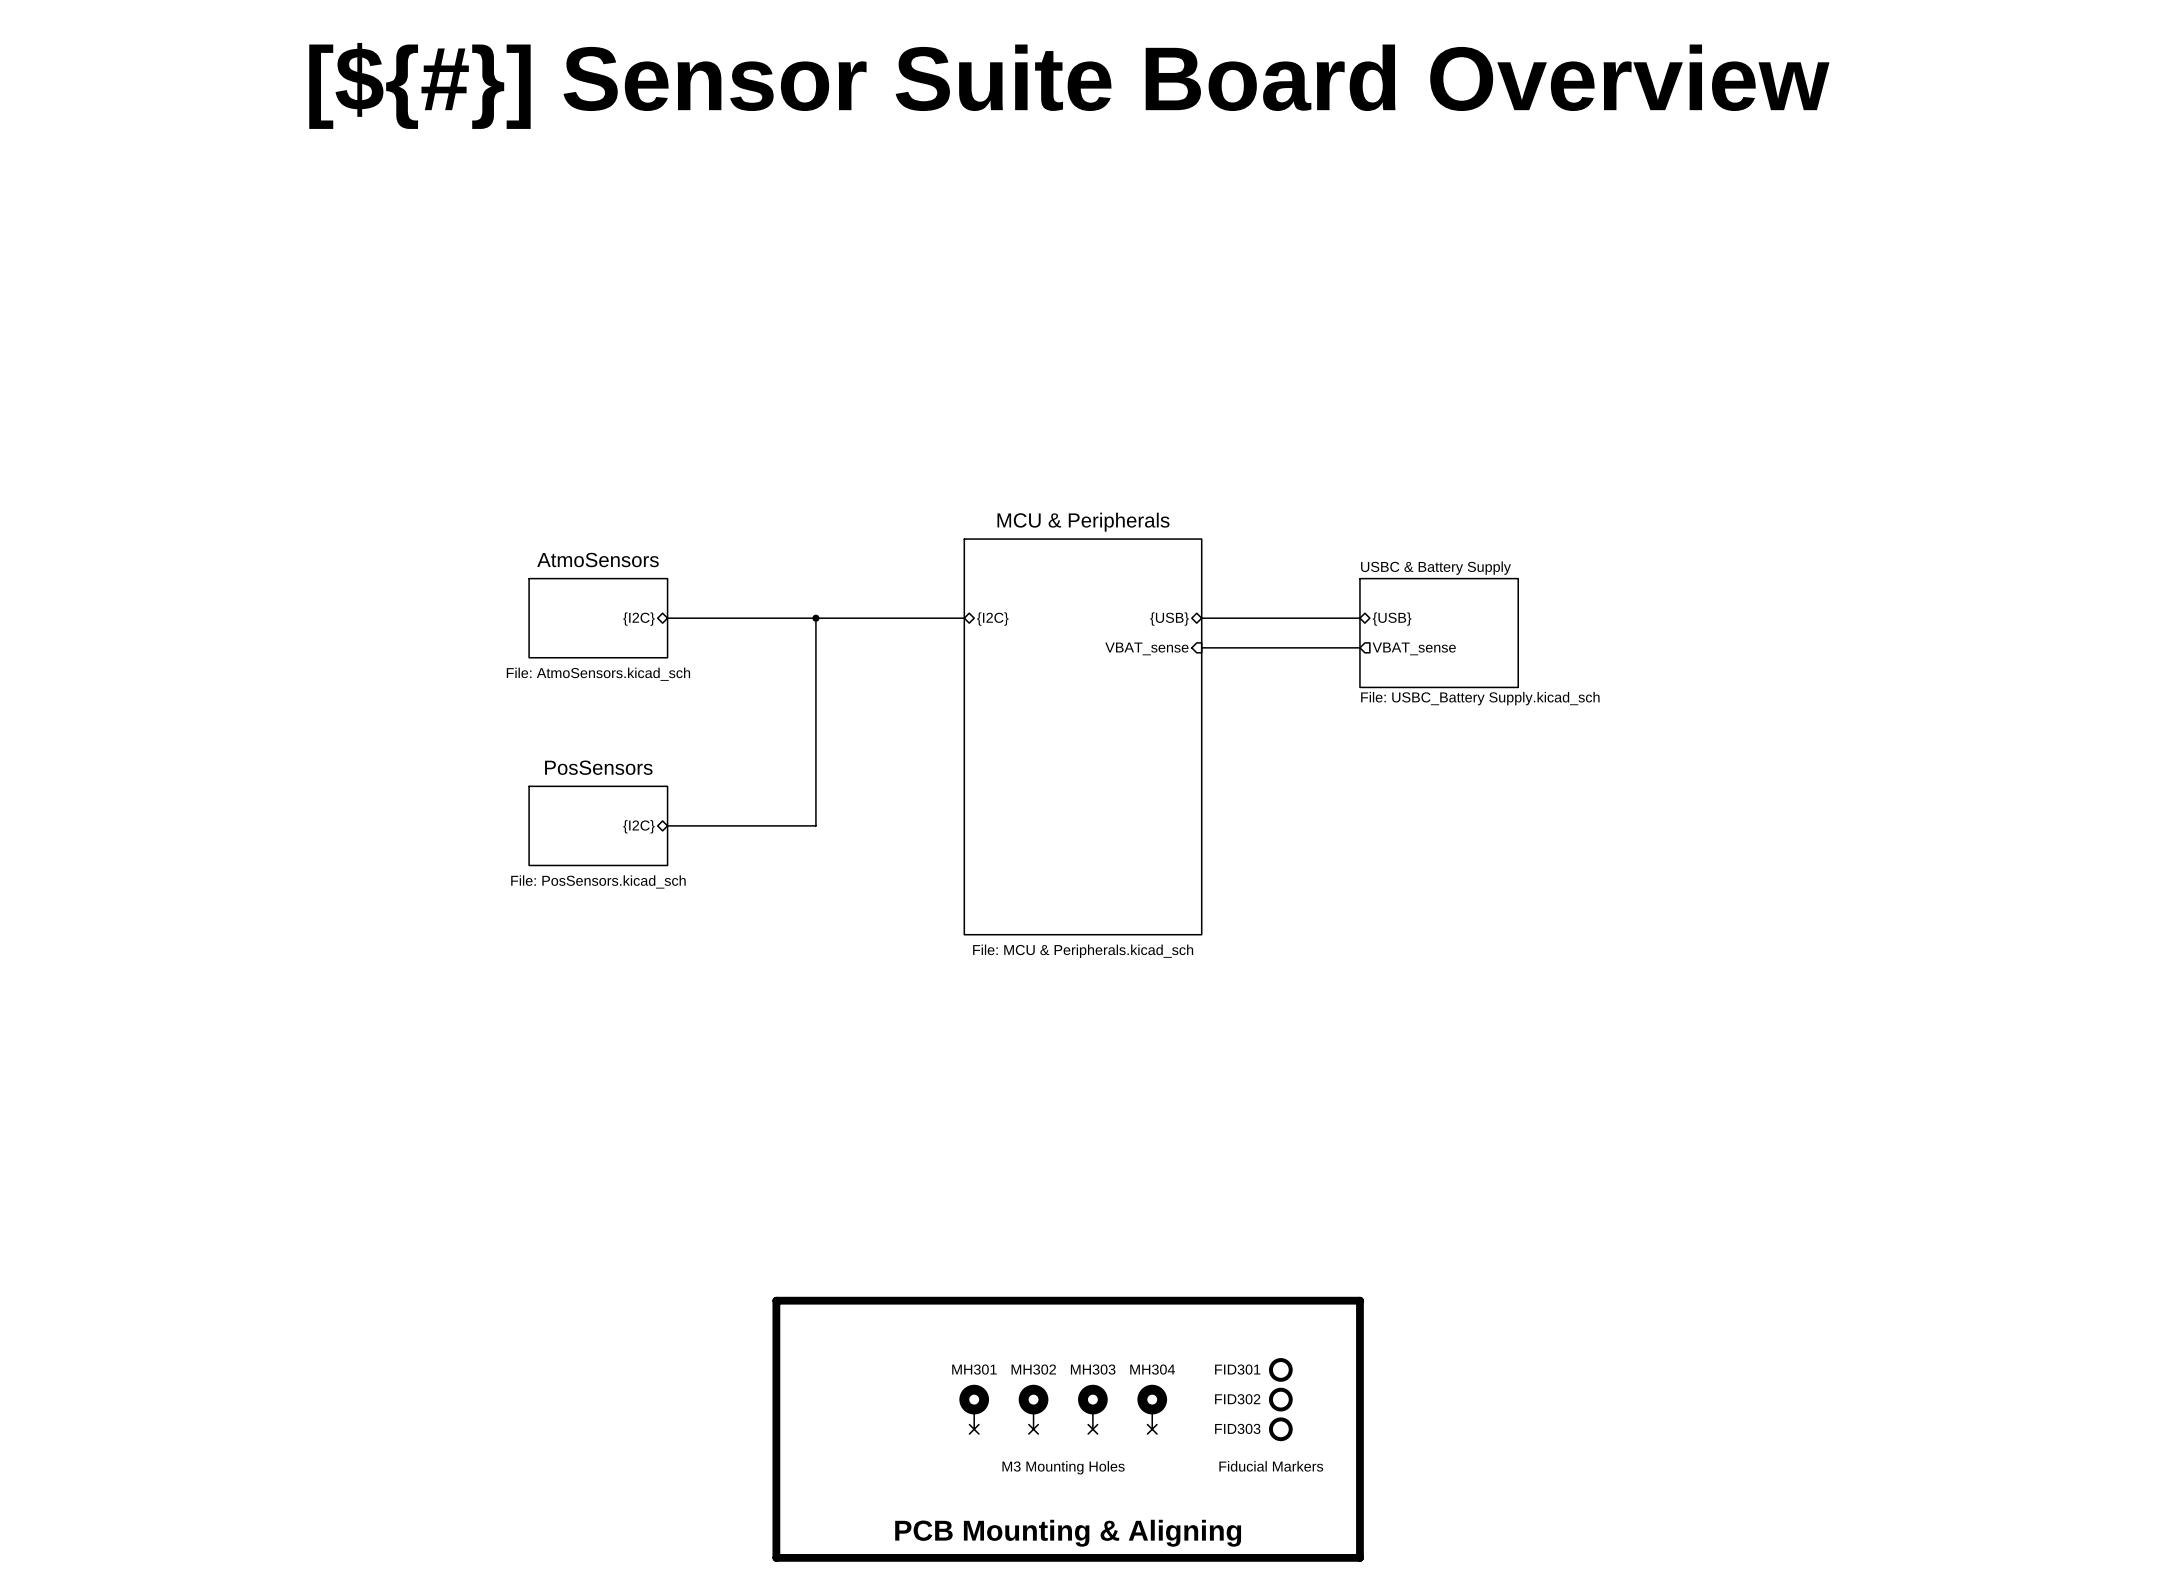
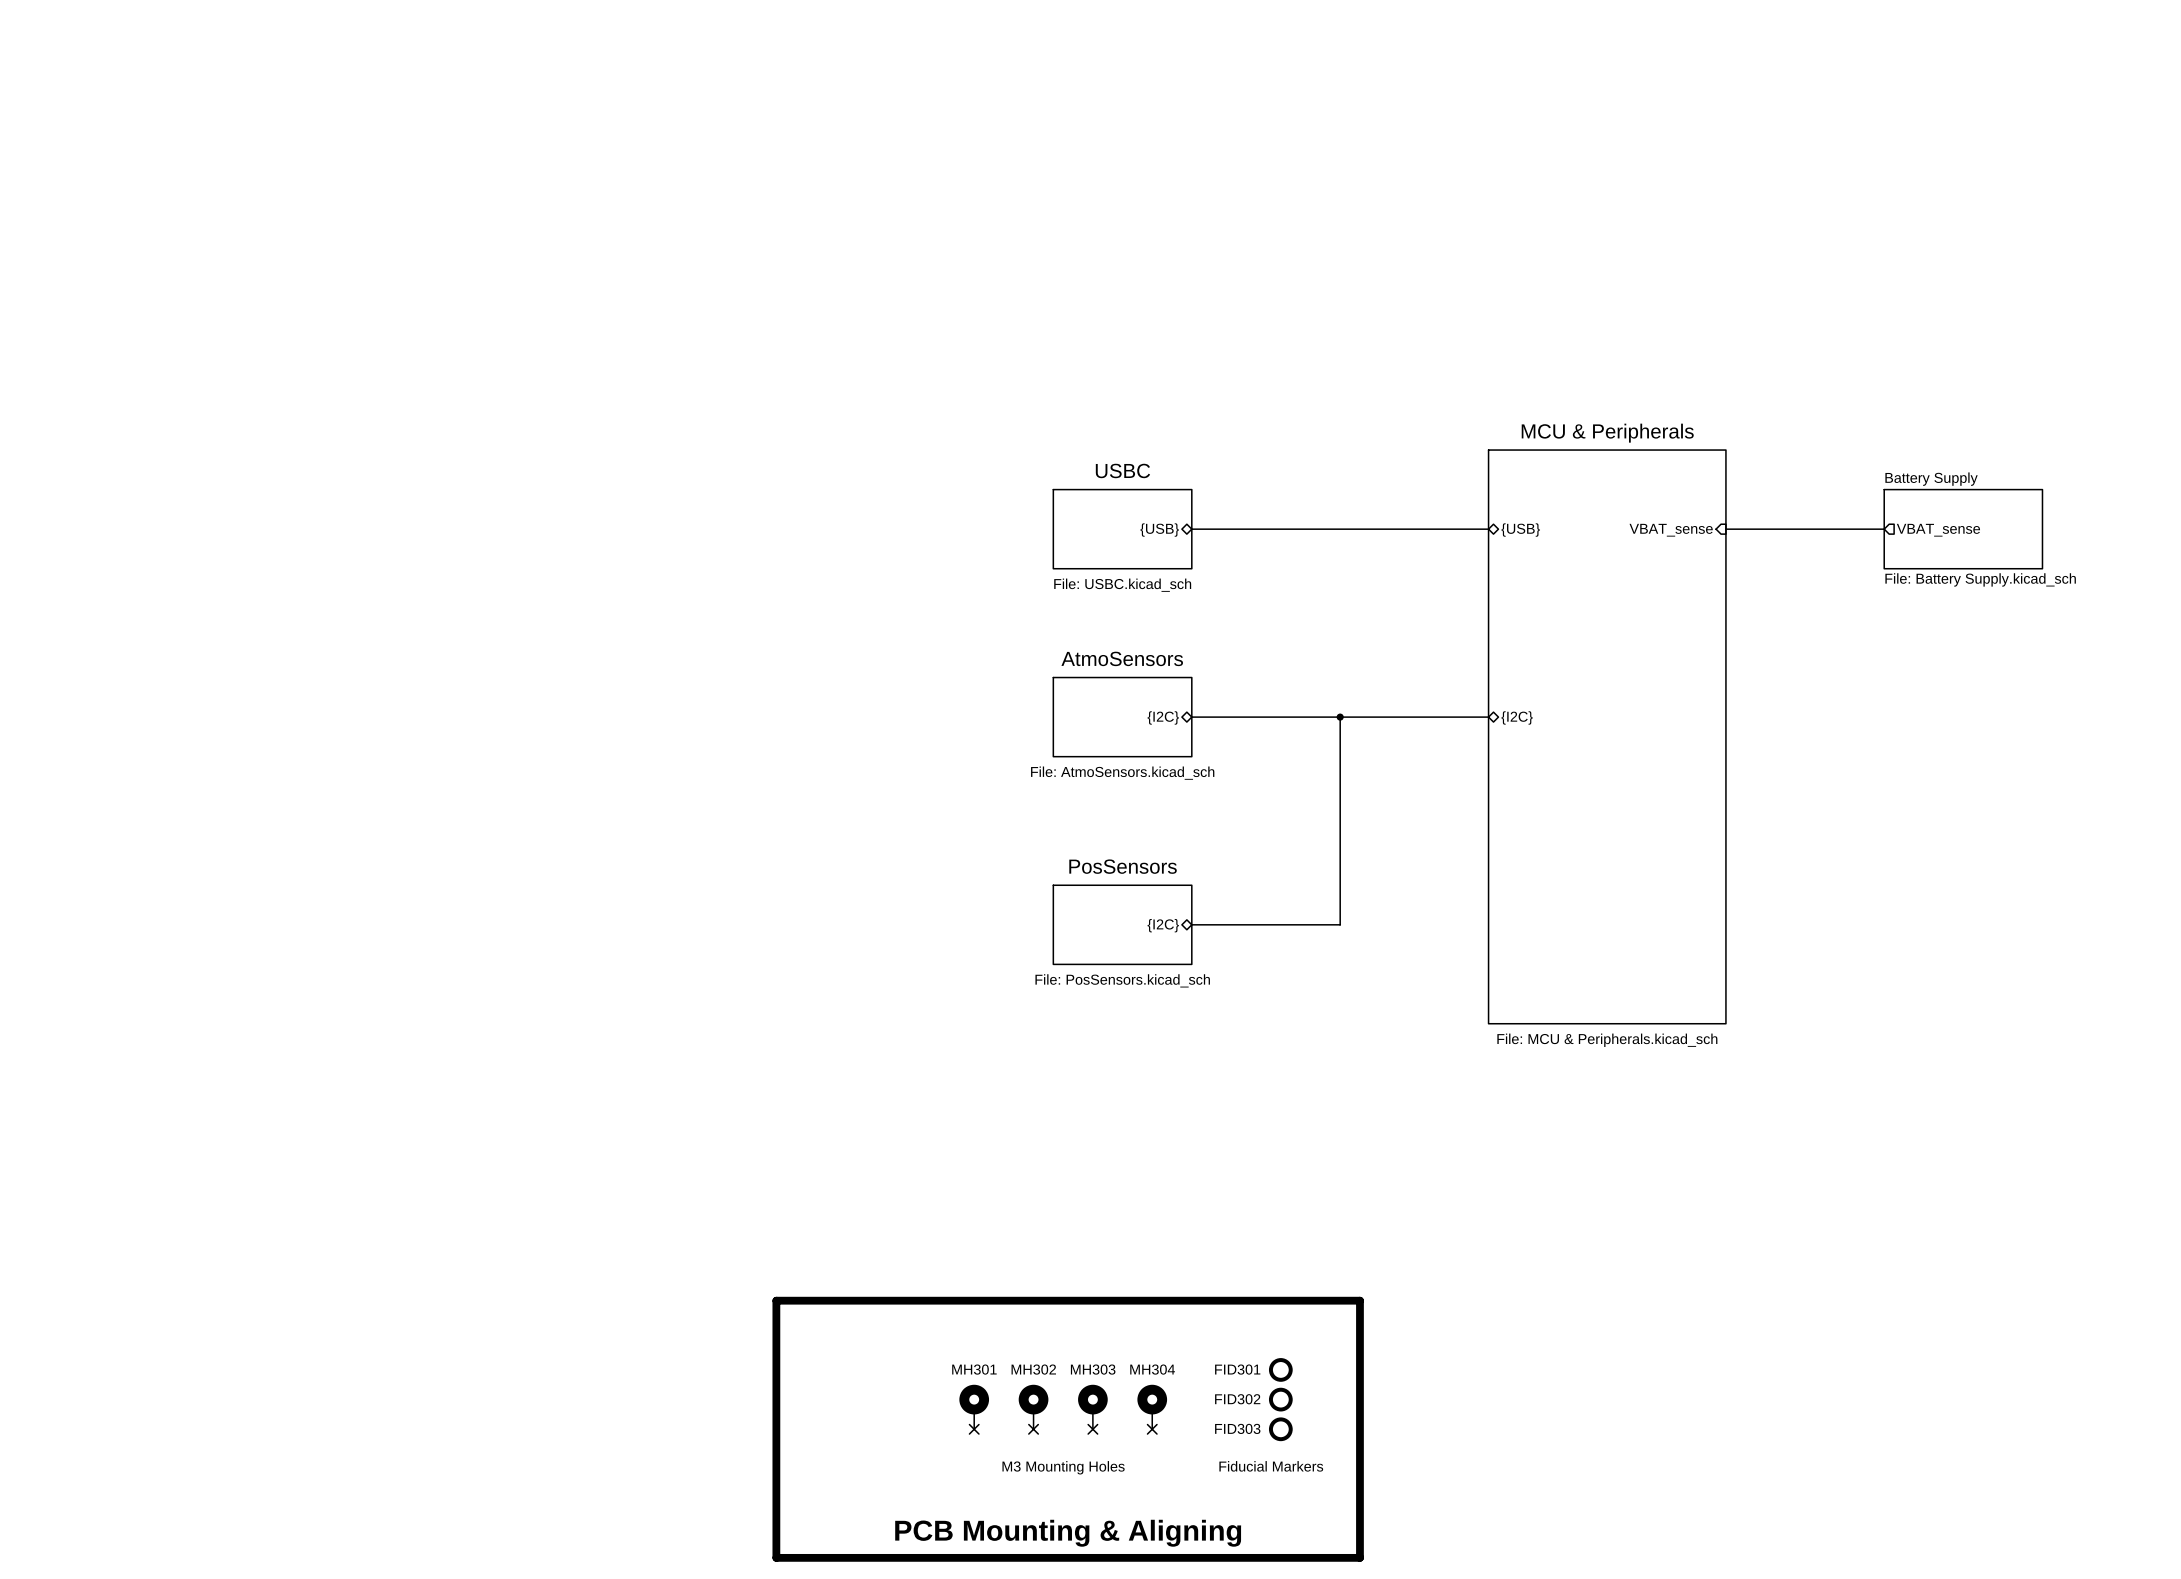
text: [${#}] Sensor Suite Board Overview (1069, 85) -> none
sheet USBC: none -> File: USBC.kicad_sch (1122, 529)
bus: none -> (1191, 529) (1488, 529)
wire: none -> (1725, 529) (1884, 529)
sheet Battery Supply: none -> File: Battery Supply.kicad_sch (1963, 529)
sheet pin: none -> {USB} (1520, 530)
sheet pin: none -> VBAT_sense (1671, 530)
sheet pin: none -> VBAT_sense (1938, 530)
sheet AtmoSensors: File: AtmoSensors.kicad_sch (598, 618) -> none
bus: (667, 618) (964, 618) -> none
bus: (815, 618) (815, 825) (667, 825) -> none
junction: (815, 618) -> none
bus: (1201, 618) (1359, 618) -> none
sheet pin: {I2C} (639, 619) -> none
sheet pin: {I2C} (992, 619) -> none
sheet pin position: {USB} (1169, 619) -> {USB} (1159, 530)
sheet pin: {USB} (1392, 619) -> none
sheet USBC & Battery Supply: File: USBC_Battery Supply.kicad_sch (1439, 633) -> none
wire: (1201, 647) (1359, 647) -> none
sheet pin: VBAT_sense (1146, 648) -> none
sheet pin: VBAT_sense (1414, 648) -> none
sheet AtmoSensors: none -> File: AtmoSensors.kicad_sch (1122, 717)
sheet pin: none -> {I2C} (1163, 717)
bus: none -> (1191, 717) (1488, 717)
bus: none -> (1340, 717) (1340, 924) (1191, 924)
junction: none -> (1340, 717)
sheet pin: none -> {I2C} (1517, 717)
sheet MCU & Peripherals: File: MCU & Peripherals.kicad_sch (1083, 736) -> none
sheet MCU & Peripherals: none -> File: MCU & Peripherals.kicad_sch (1607, 736)
sheet PosSensors: File: PosSensors.kicad_sch (598, 825) -> none
sheet pin: {I2C} (639, 826) -> none
sheet PosSensors: none -> File: PosSensors.kicad_sch (1122, 924)
sheet pin: none -> {I2C} (1163, 925)

